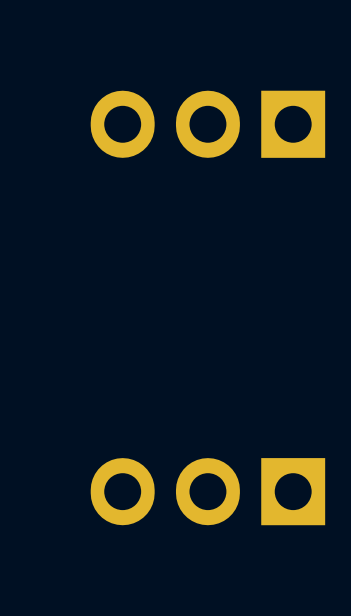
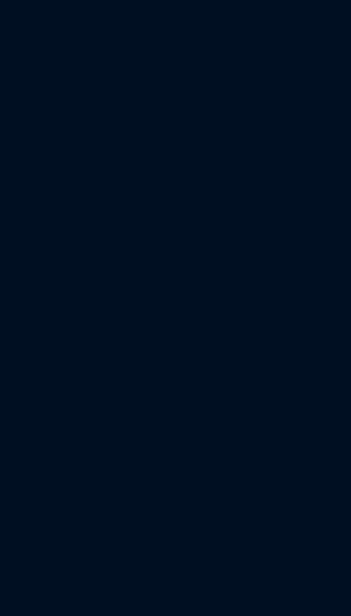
part: (207, 124) -> none
part: (207, 491) -> none

